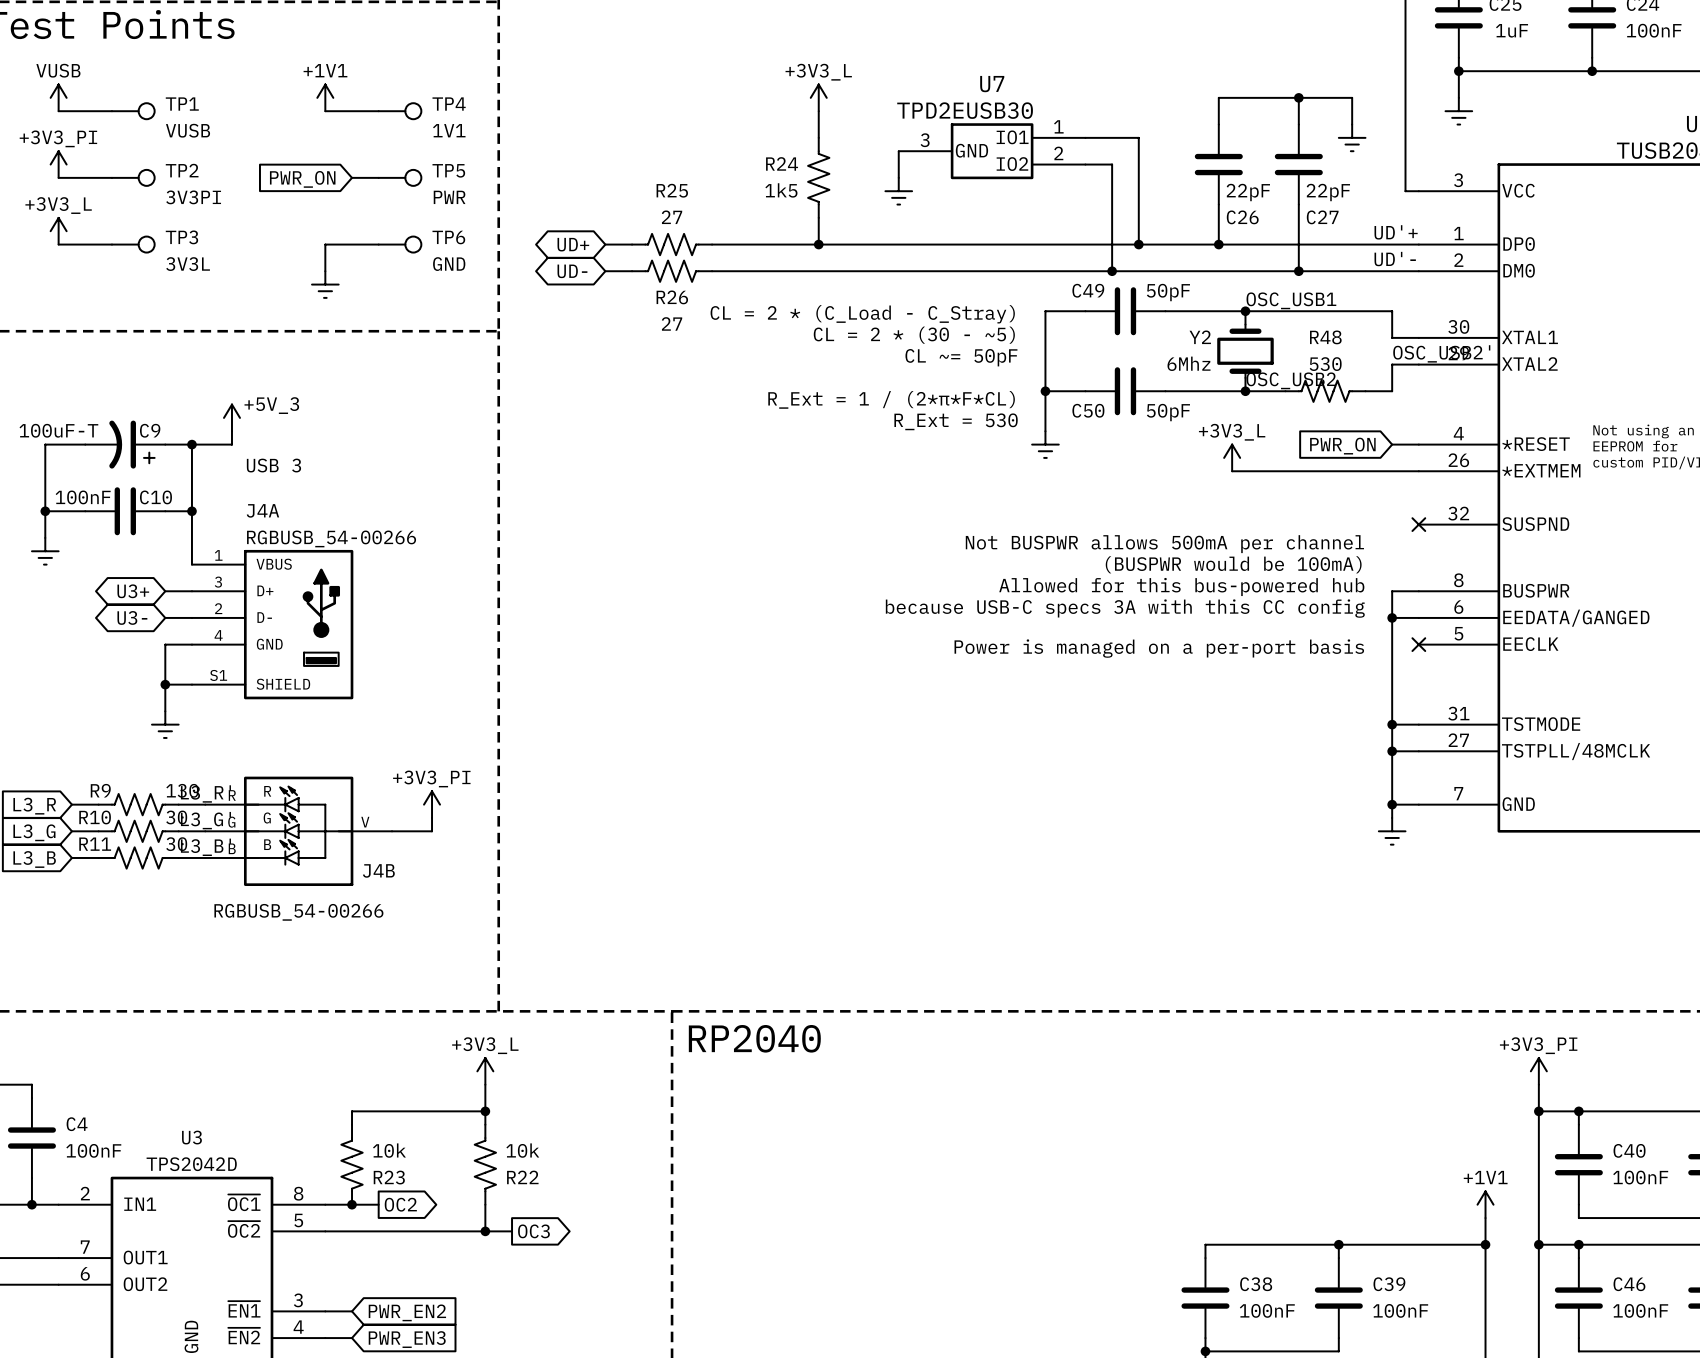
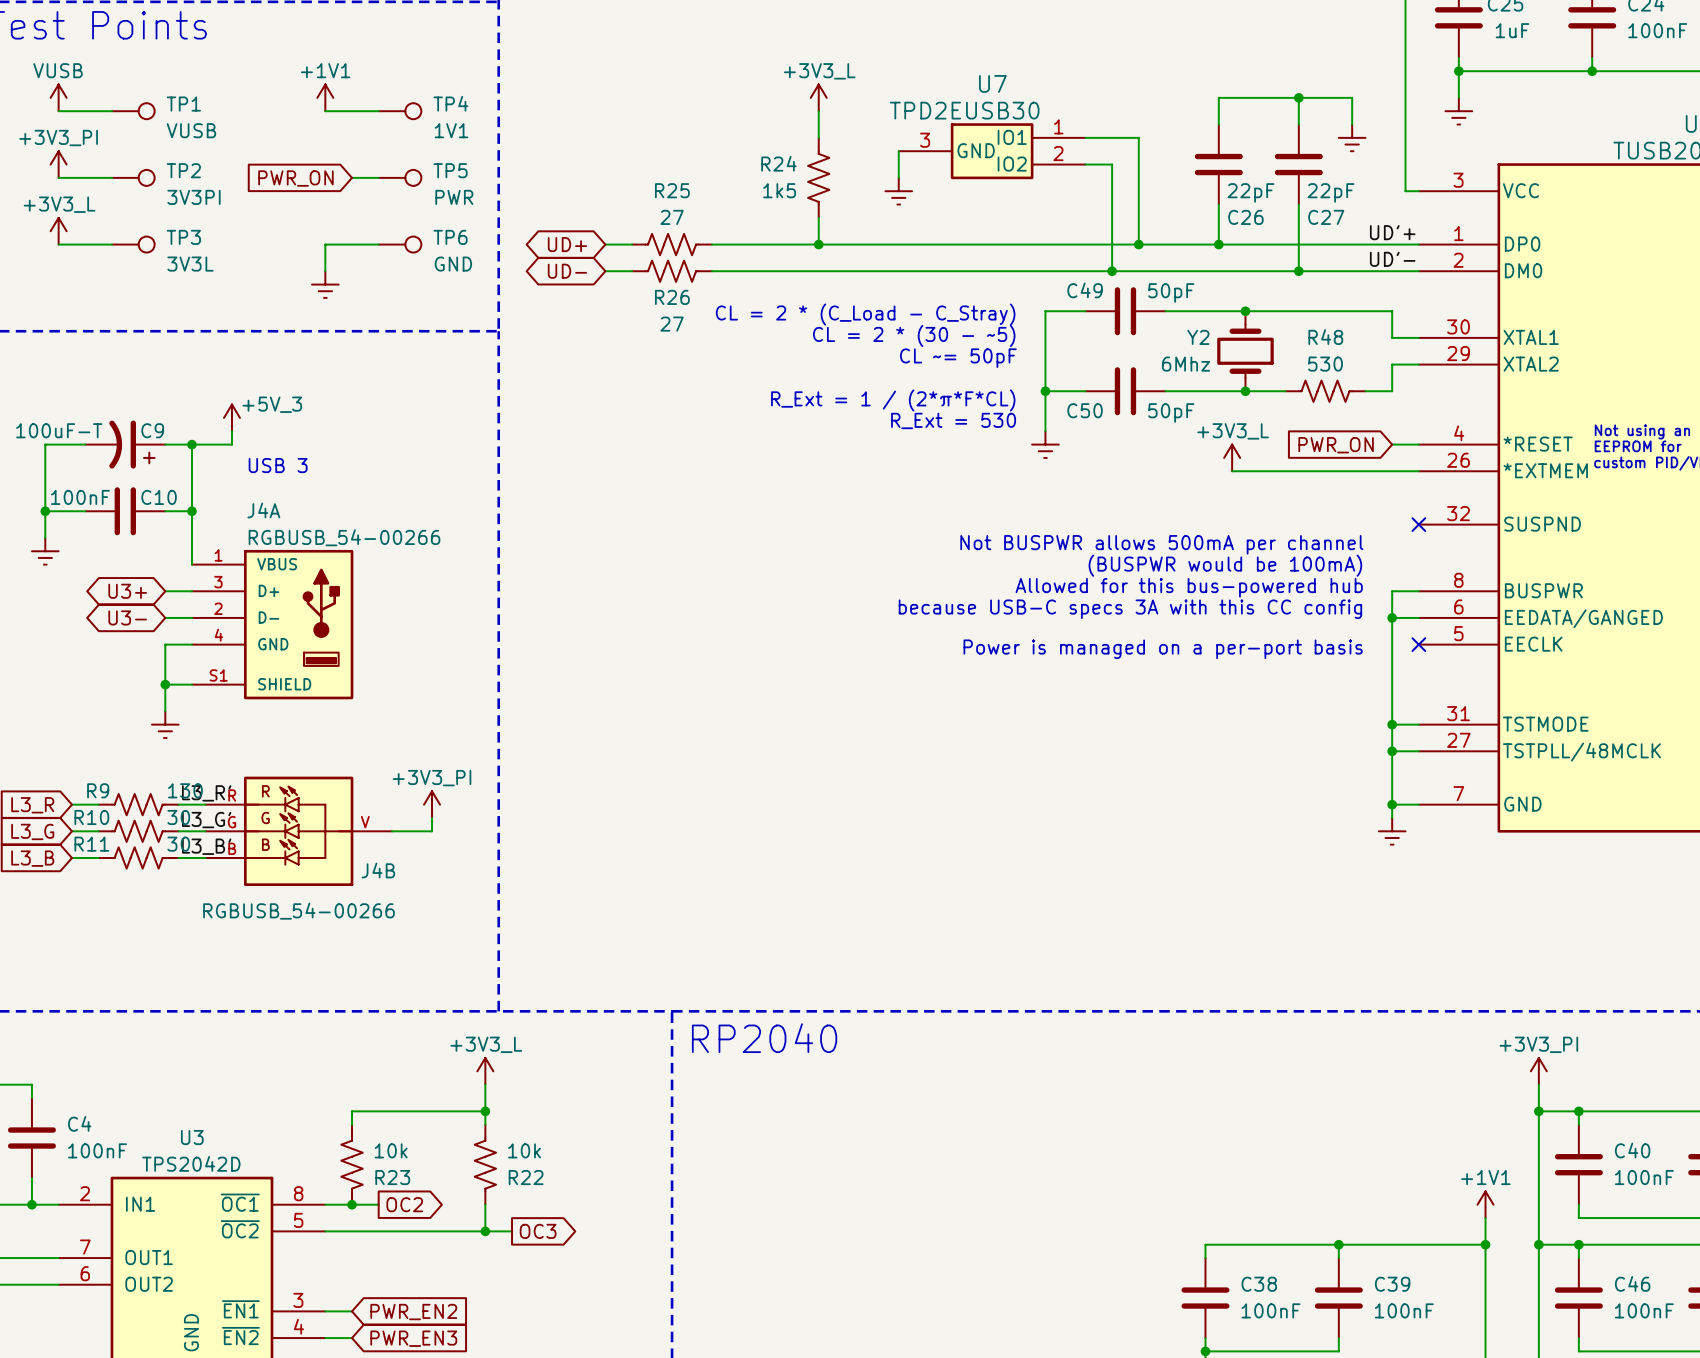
label: OSC_USB1 (1291, 300) -> none
label: OSC_USB2' (1441, 353) -> none
label: OSC_USB2 (1291, 380) -> none

